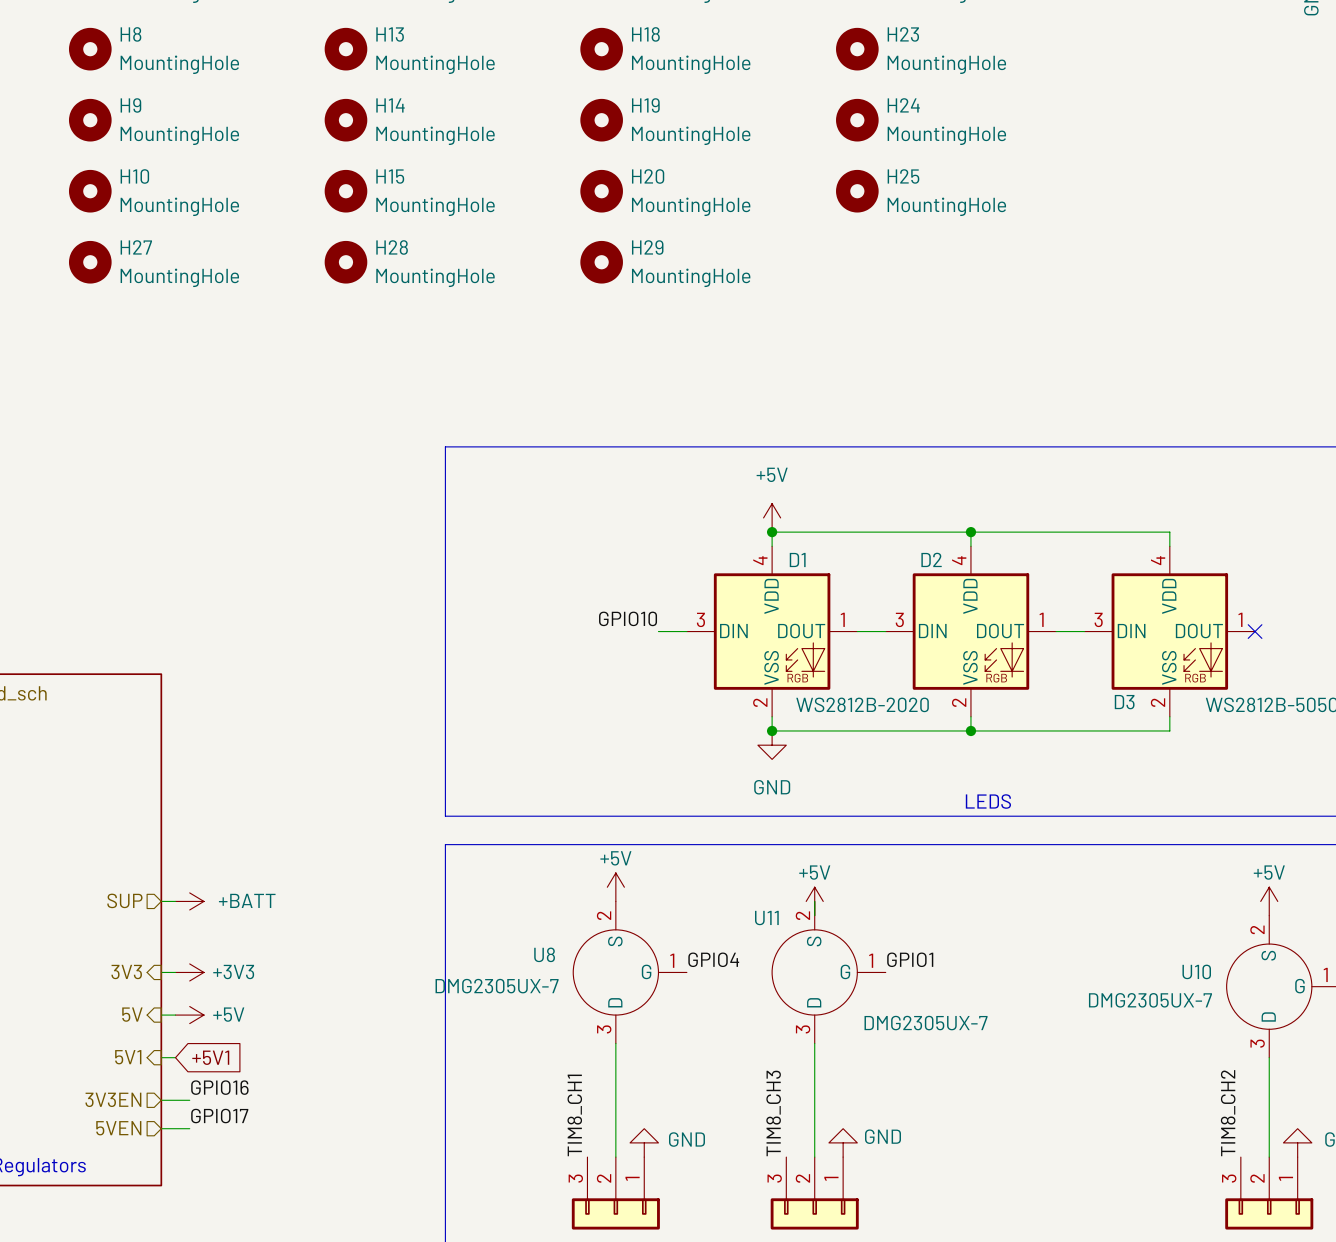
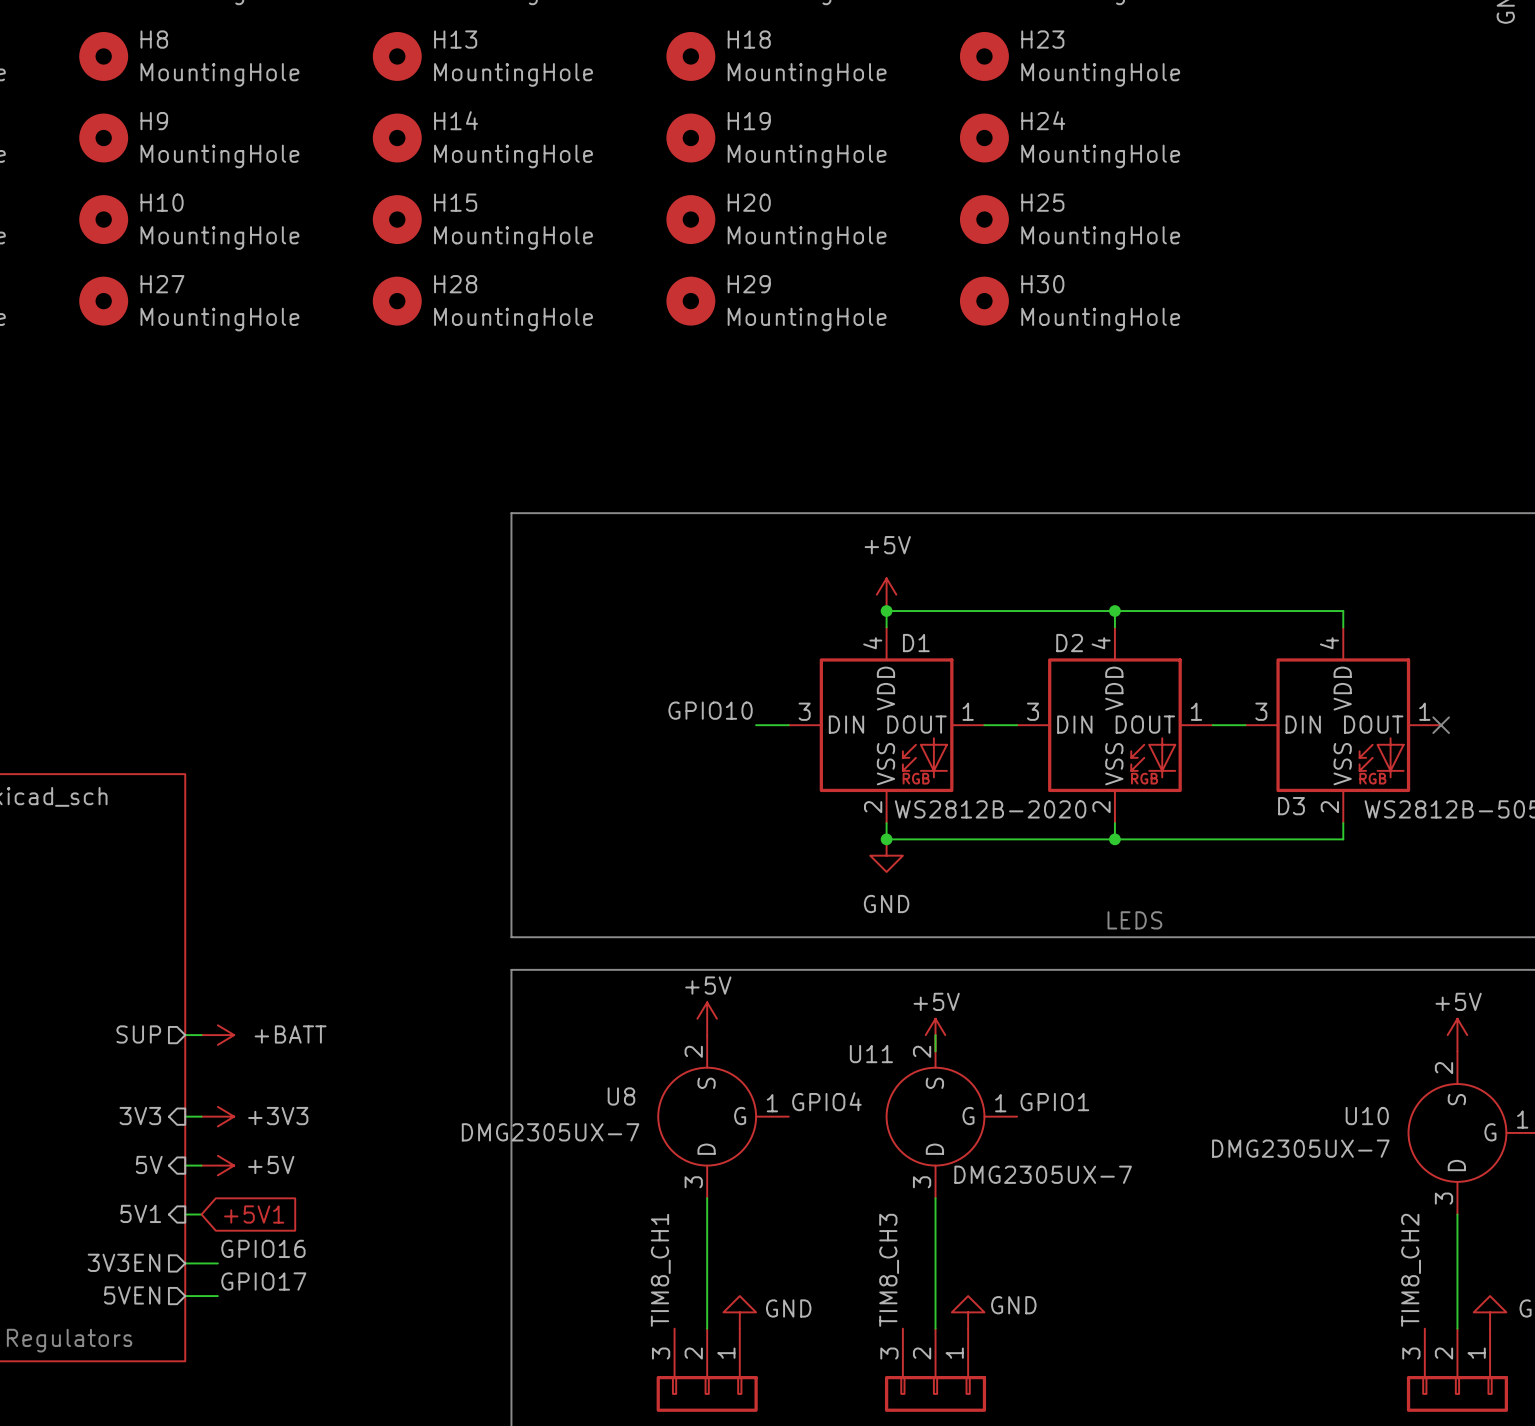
H30: none -> MountingHole (984, 301)

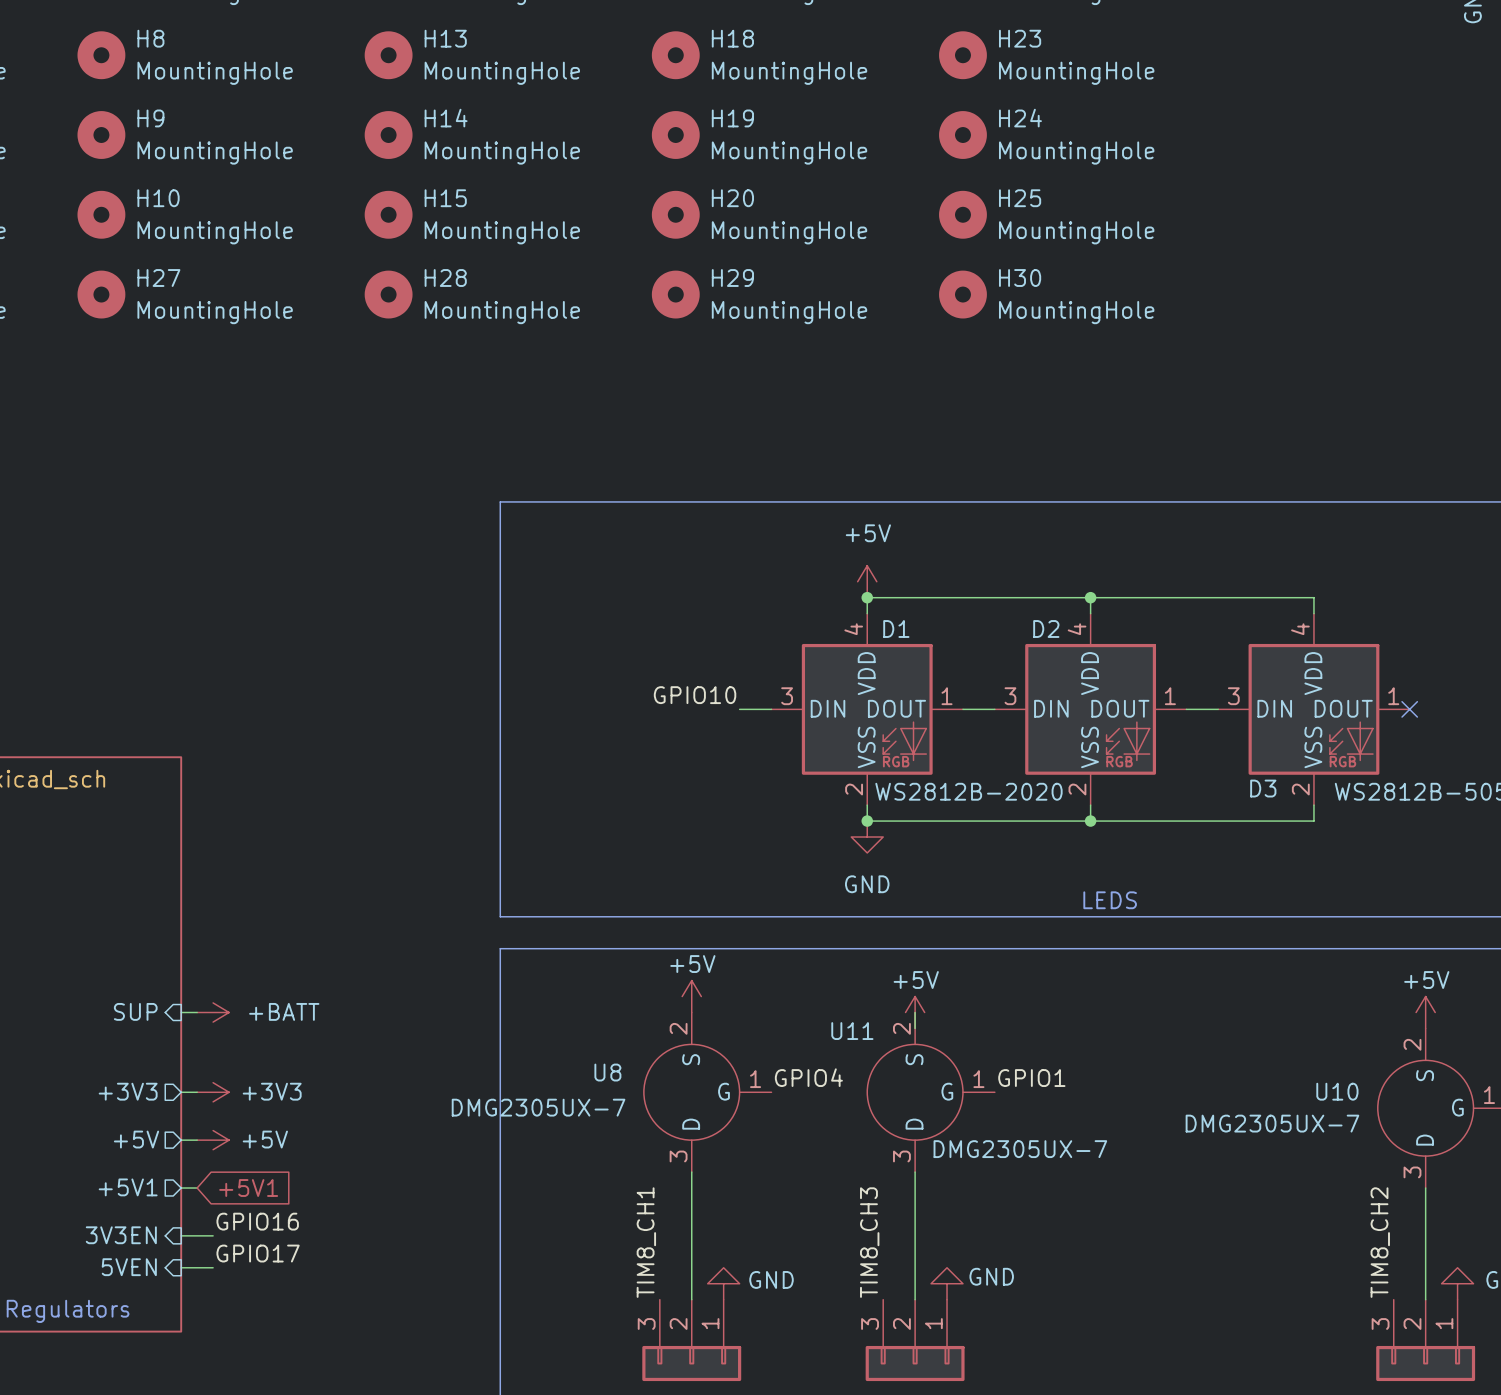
hierarchical label: SUP (138, 1034) -> none
sheet pin: none -> SUP (135, 1011)
sheet pin: none -> +3V3 (128, 1091)
hierarchical label: 3V3 (140, 1116) -> none
sheet pin: none -> +5V (136, 1139)
hierarchical label: 5V (149, 1164) -> none
sheet pin: none -> +5V1 (128, 1187)
hierarchical label: 5V1 (140, 1213) -> none
hierarchical label: 3V3EN (124, 1262) -> none
sheet pin: none -> 3V3EN (121, 1235)
hierarchical label: 5VEN (132, 1295) -> none
sheet pin: none -> 5VEN (129, 1267)

